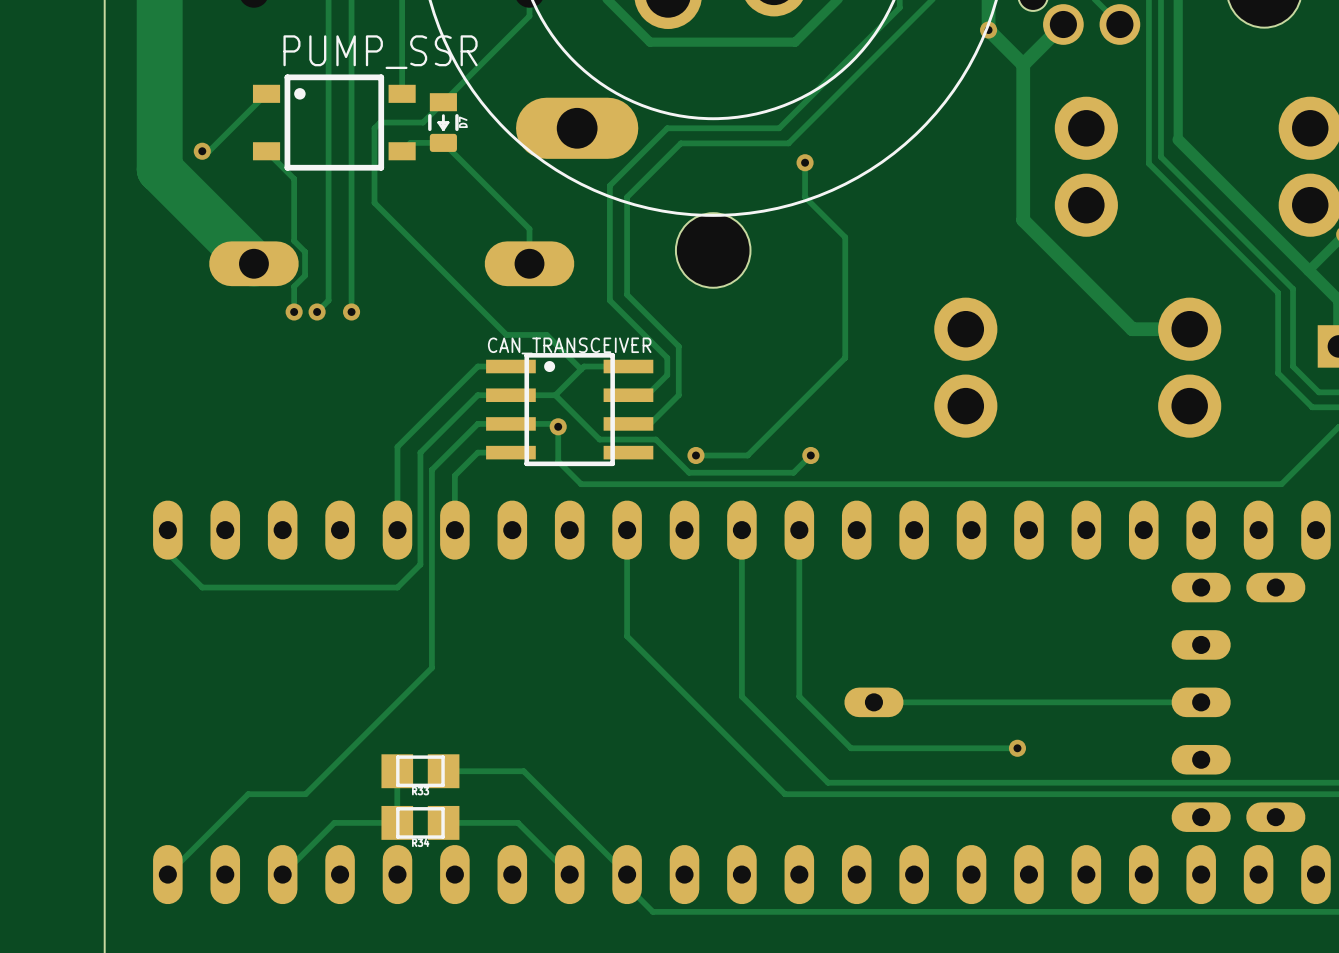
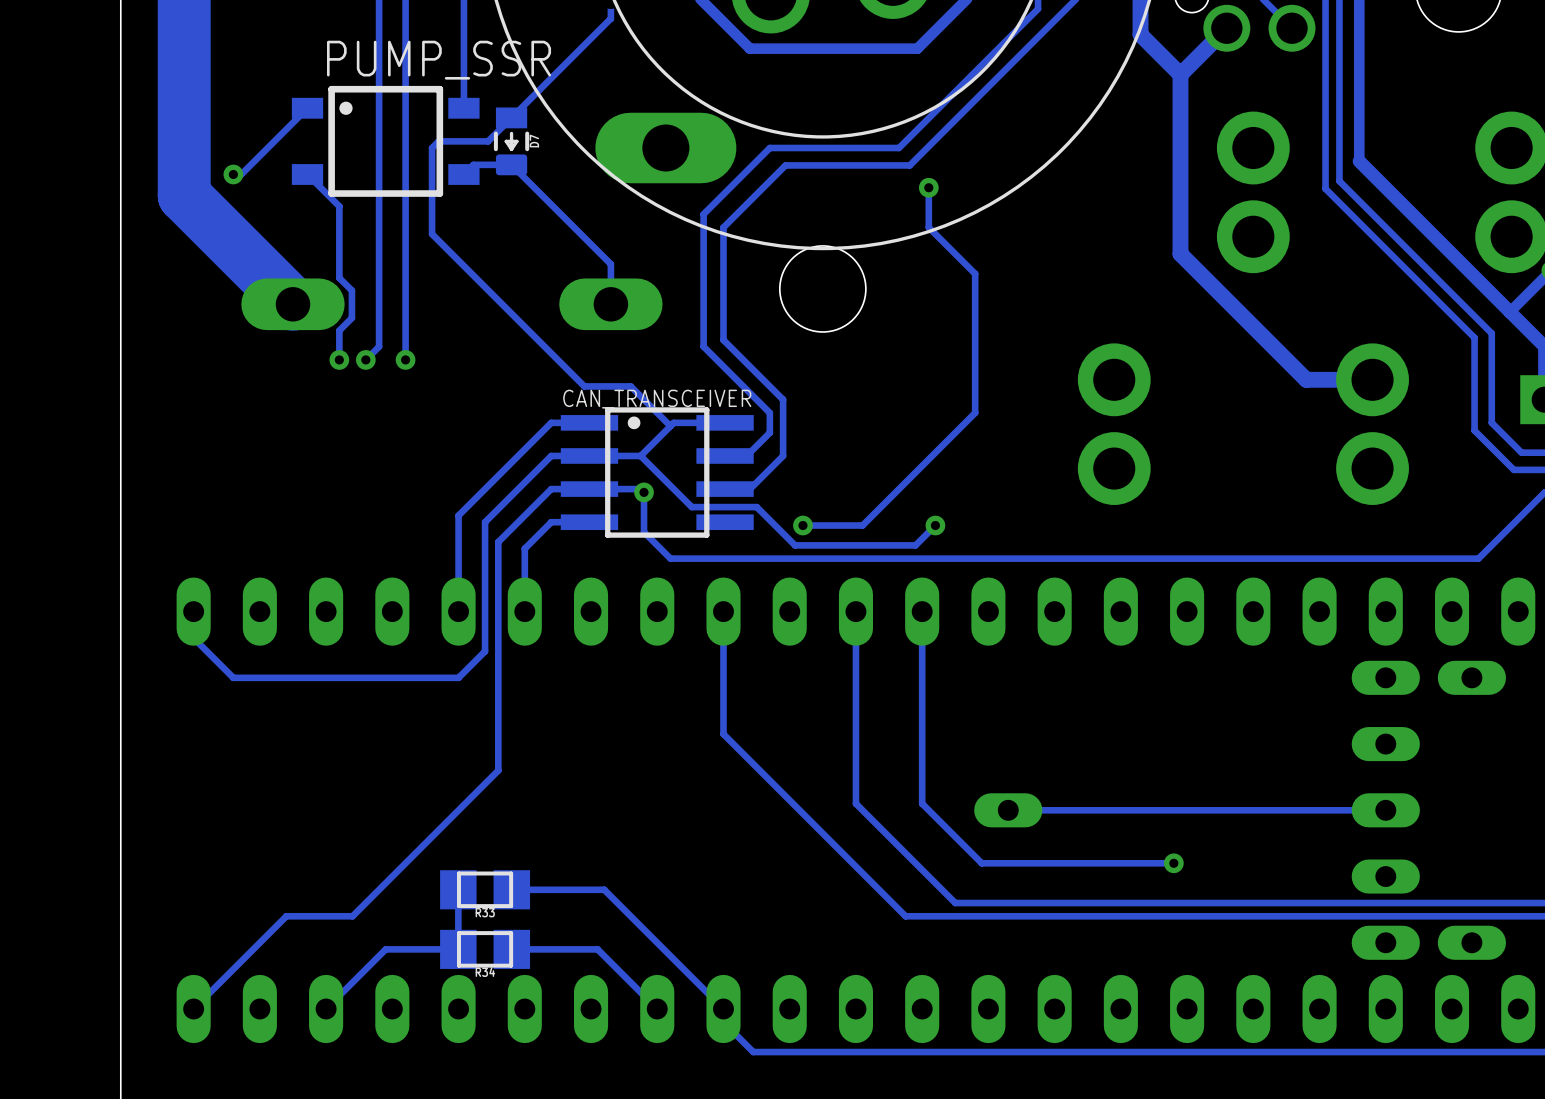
via: (988, 30) -> none

